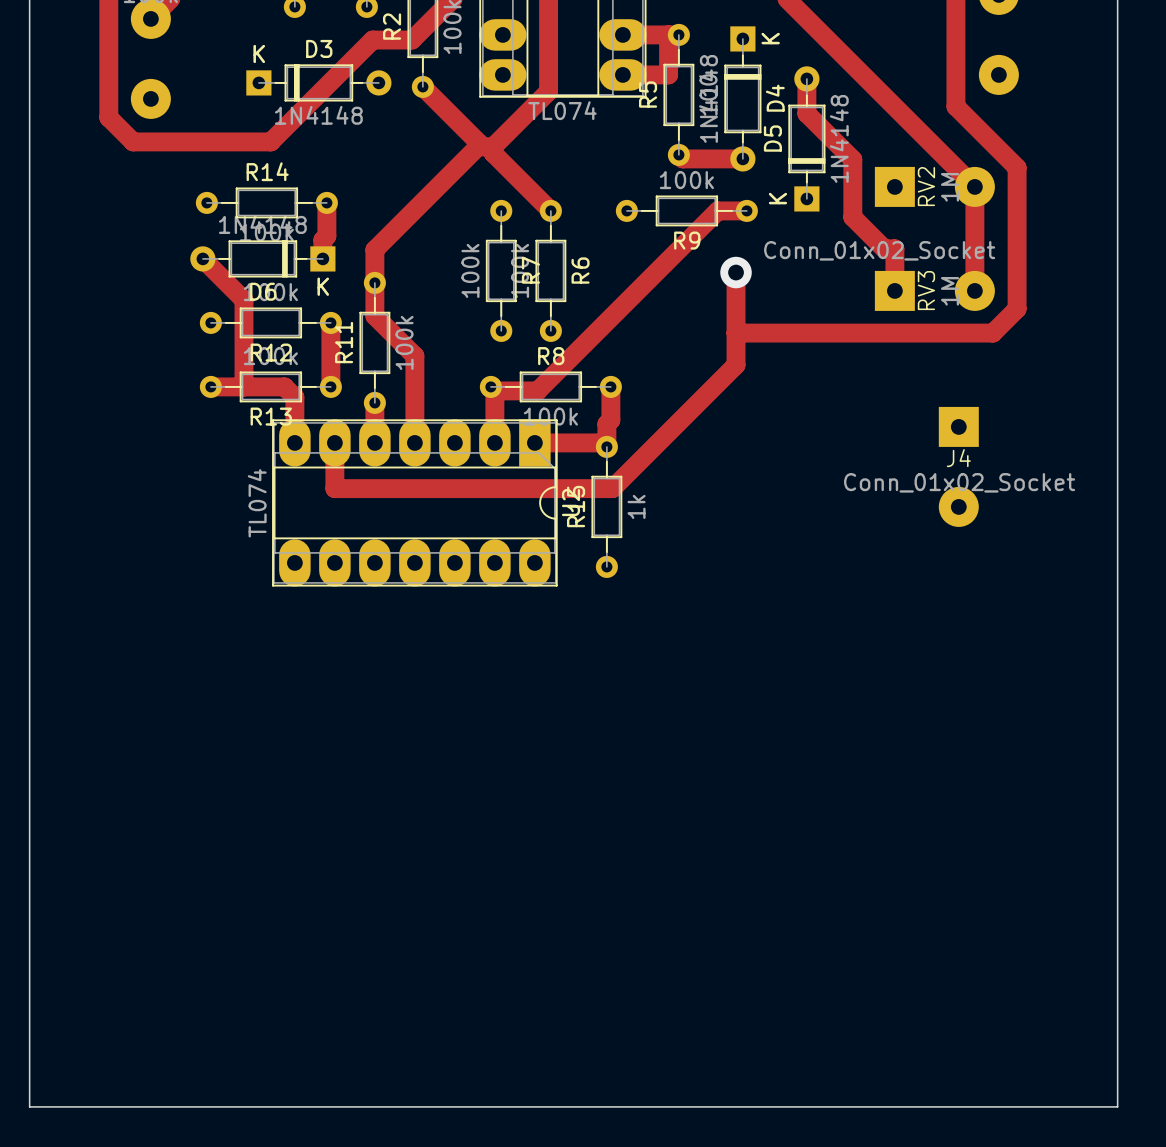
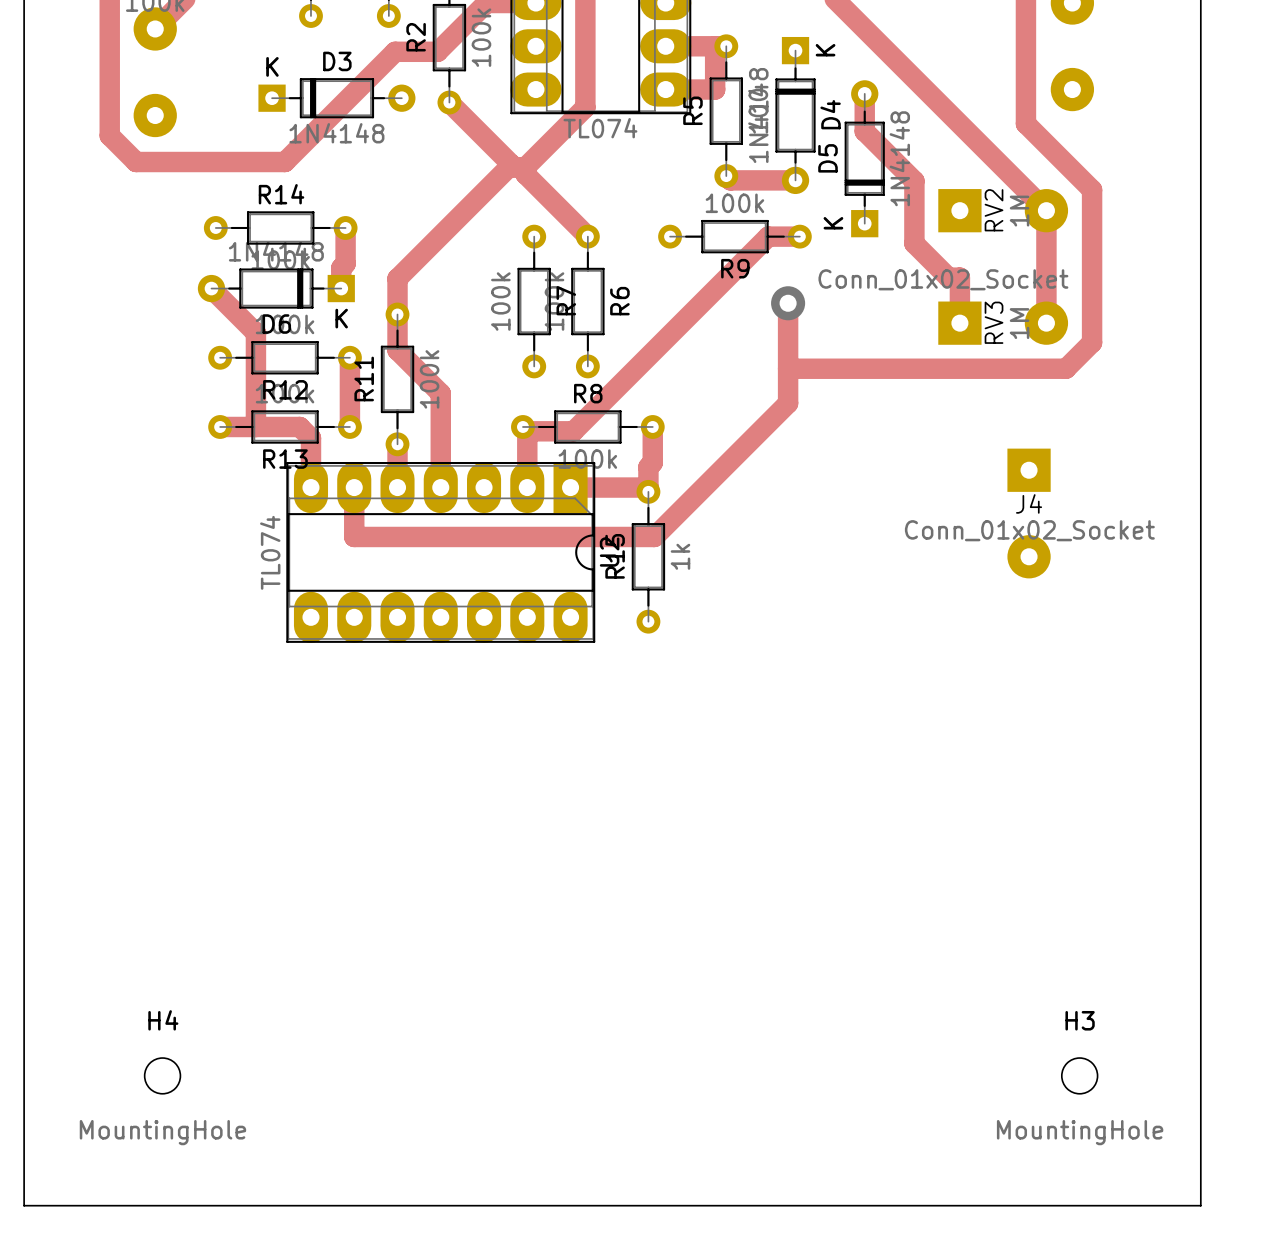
H4: none -> MountingHole (162, 1075)
H3: none -> MountingHole (1079, 1075)

